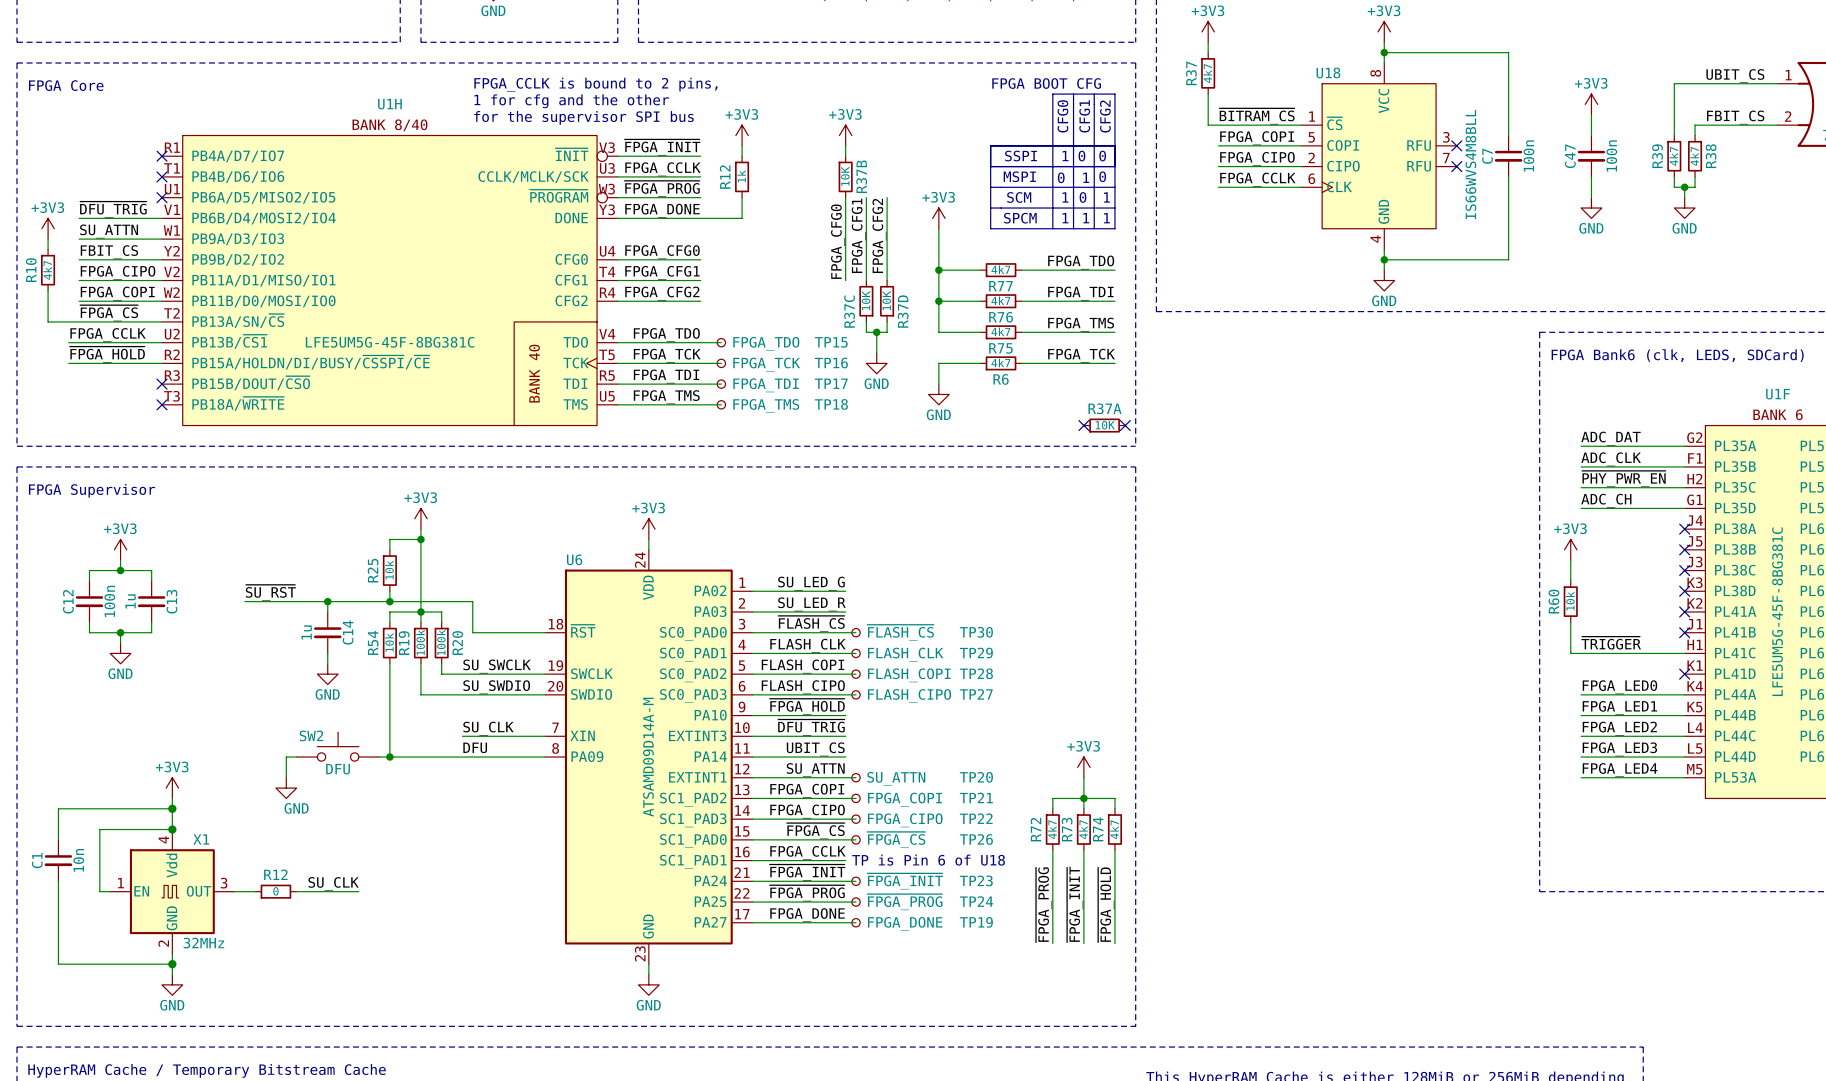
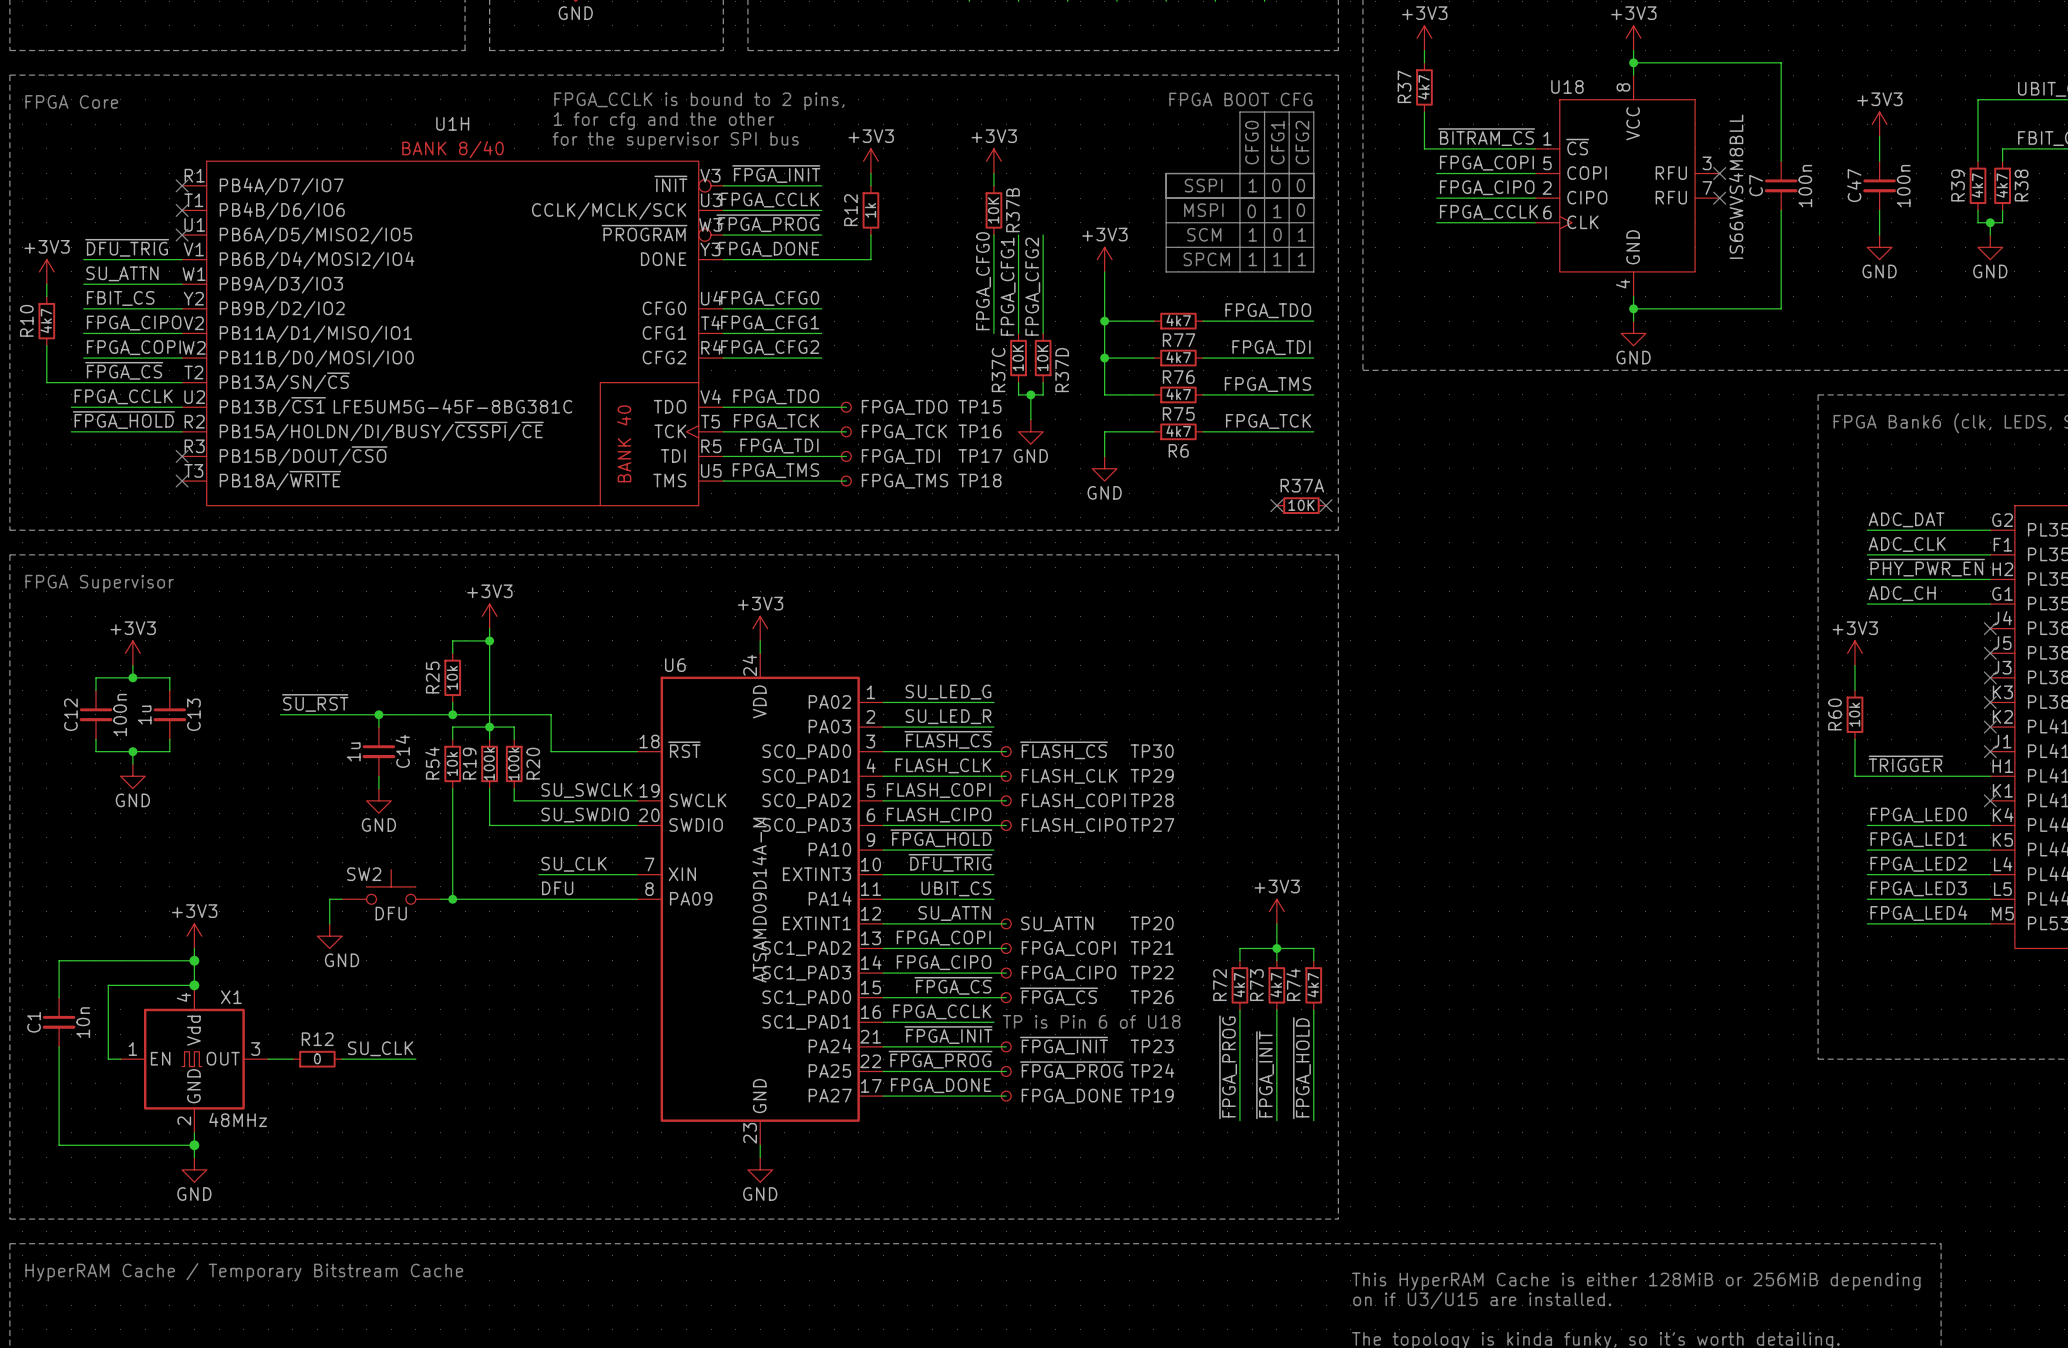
X1 value: 32MHz (203, 943) -> 48MHz (238, 1119)

